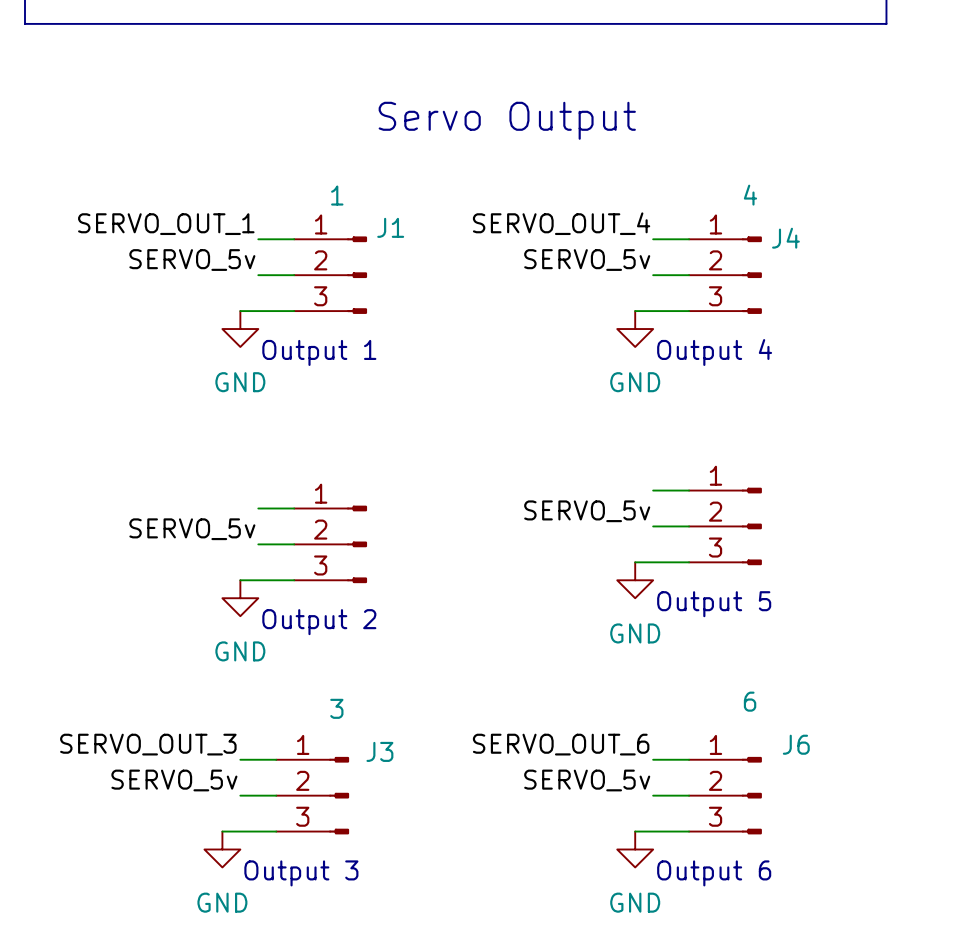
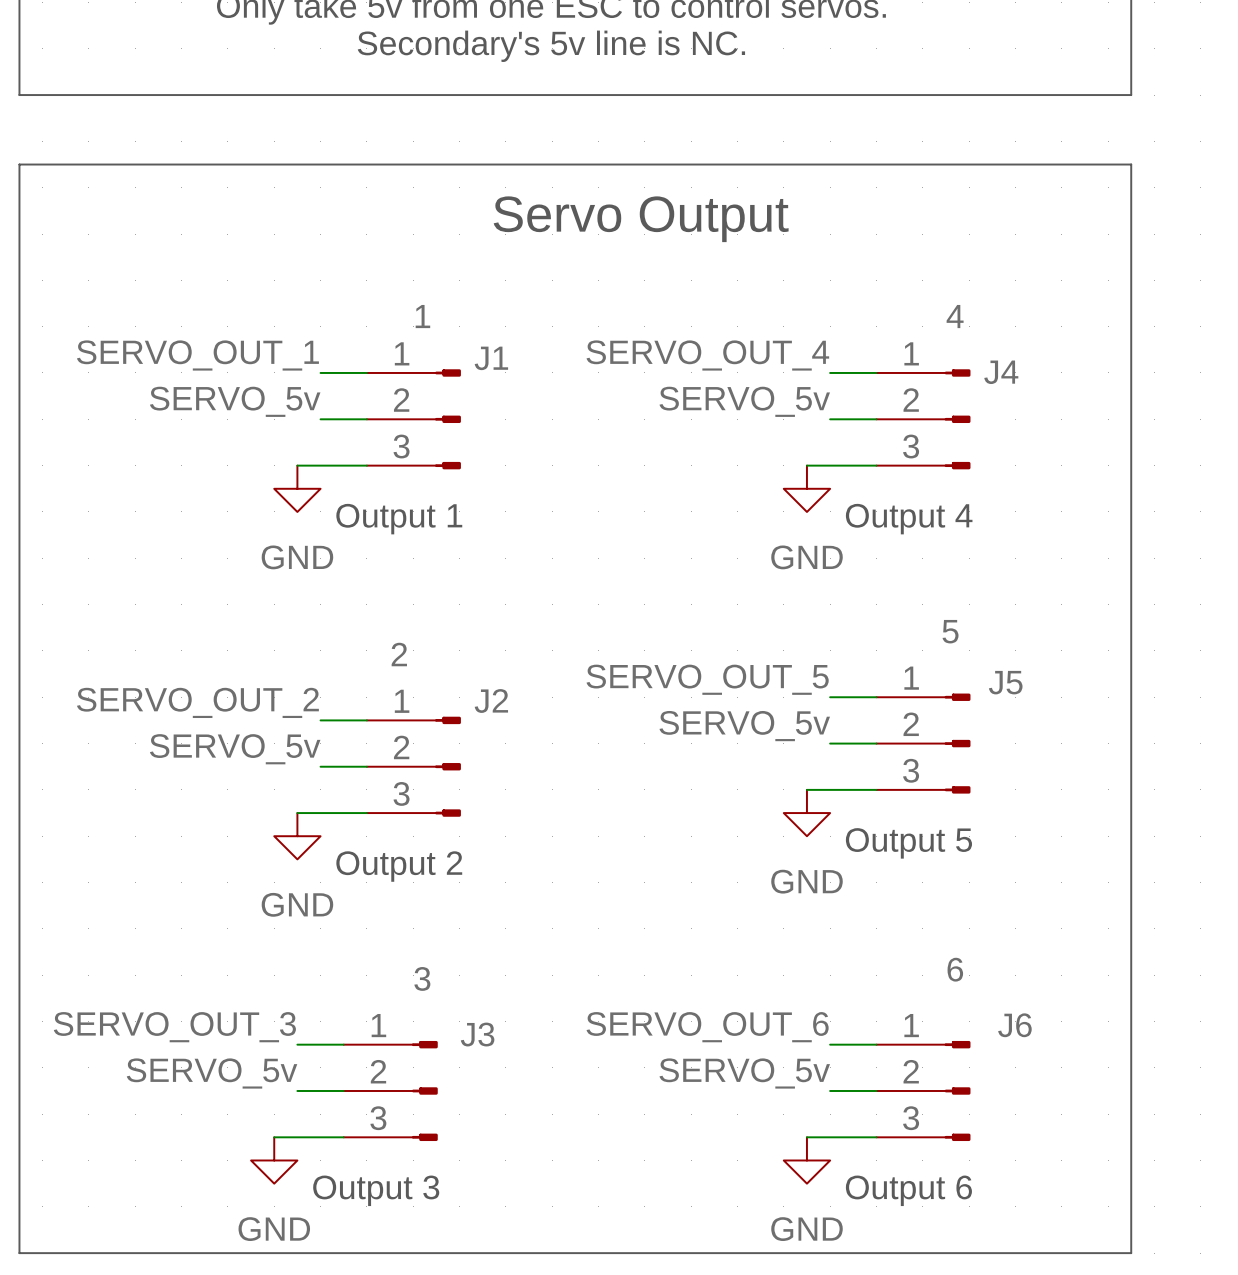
line: none -> (19, 164) (1131, 164) (1131, 1253) (19, 1253) (19, 164)
J5 value: none -> 5 (950, 631)
J2 value: none -> 2 (399, 654)
label: none -> SERVO_OUT_5 (707, 679)
J5 name: none -> J5 (1005, 682)
label: none -> SERVO_OUT_2 (197, 702)
J2 name: none -> J2 (491, 701)

